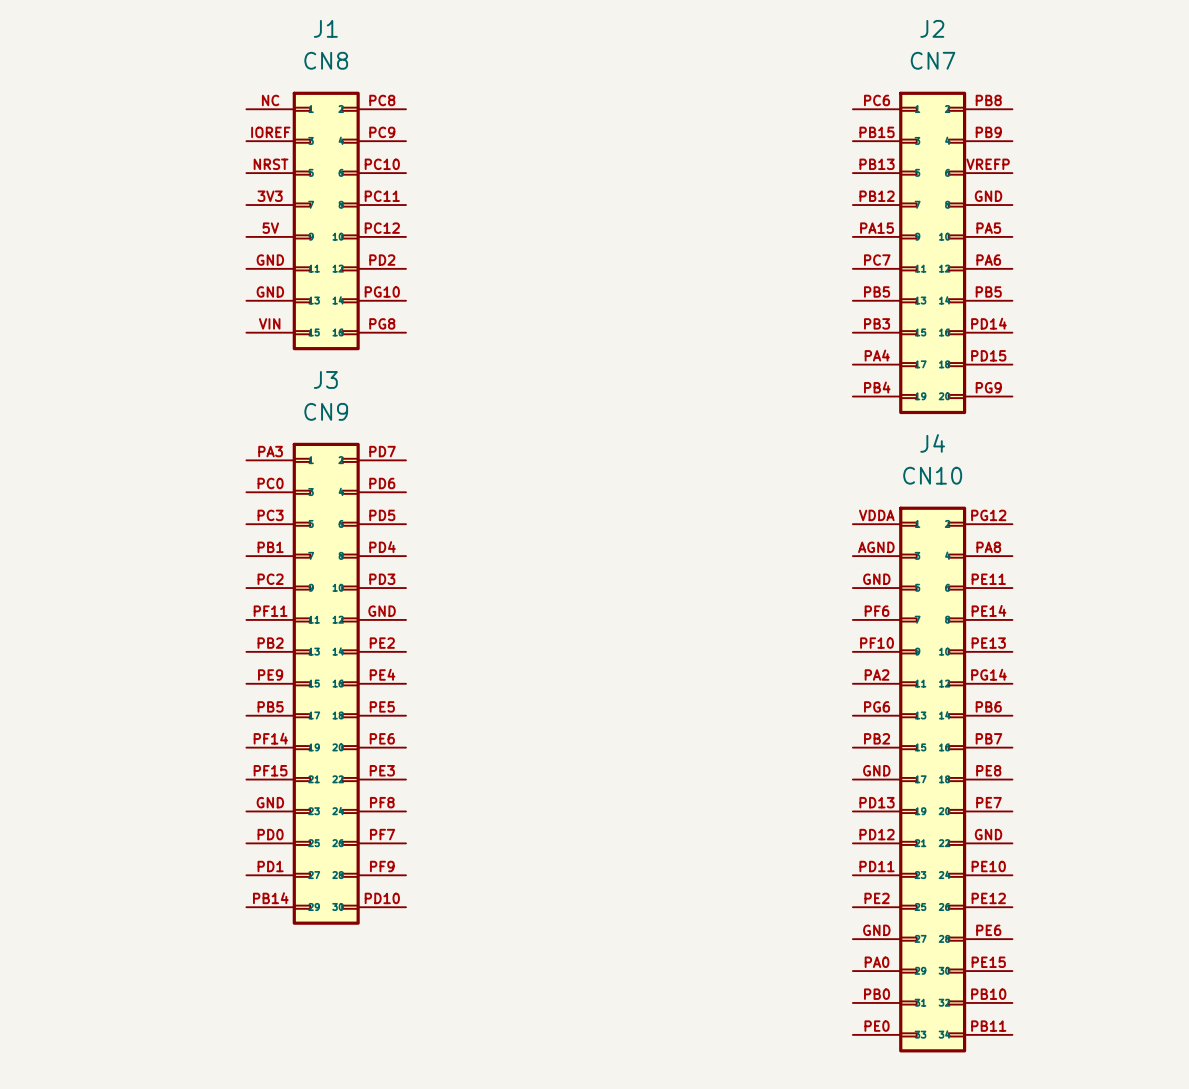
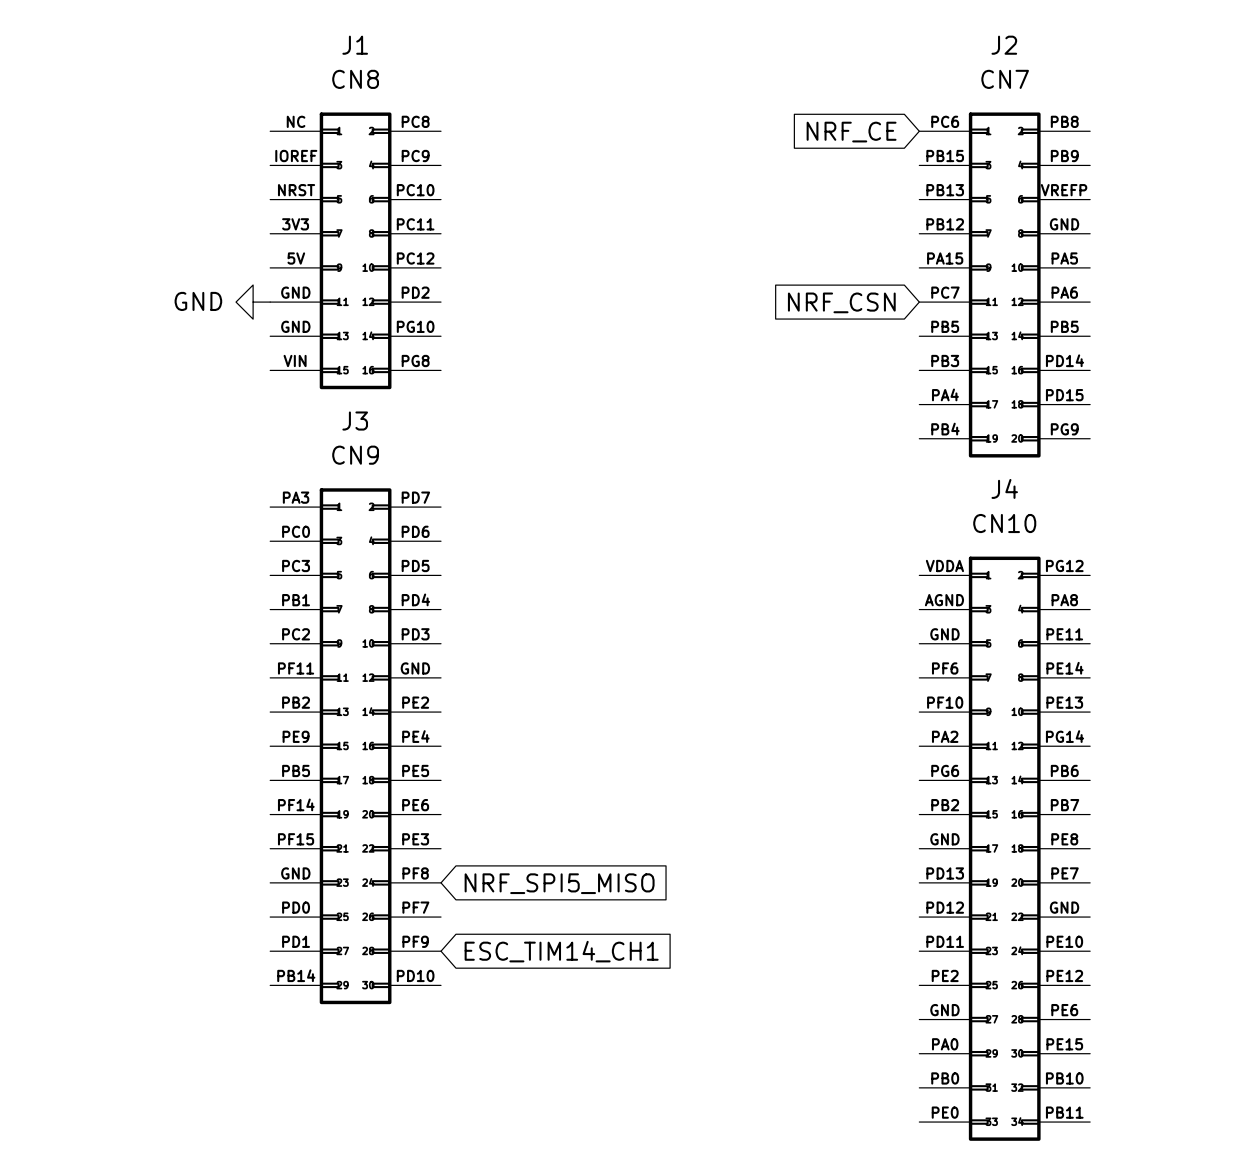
global label: none -> NRF_CE (851, 132)
power symbol: none -> GND (253, 302)
global label: none -> NRF_CSN (841, 302)
global label: none -> NRF_SPI5_MISO (559, 883)
global label: none -> ESC_TIM14_CH1 (561, 951)

